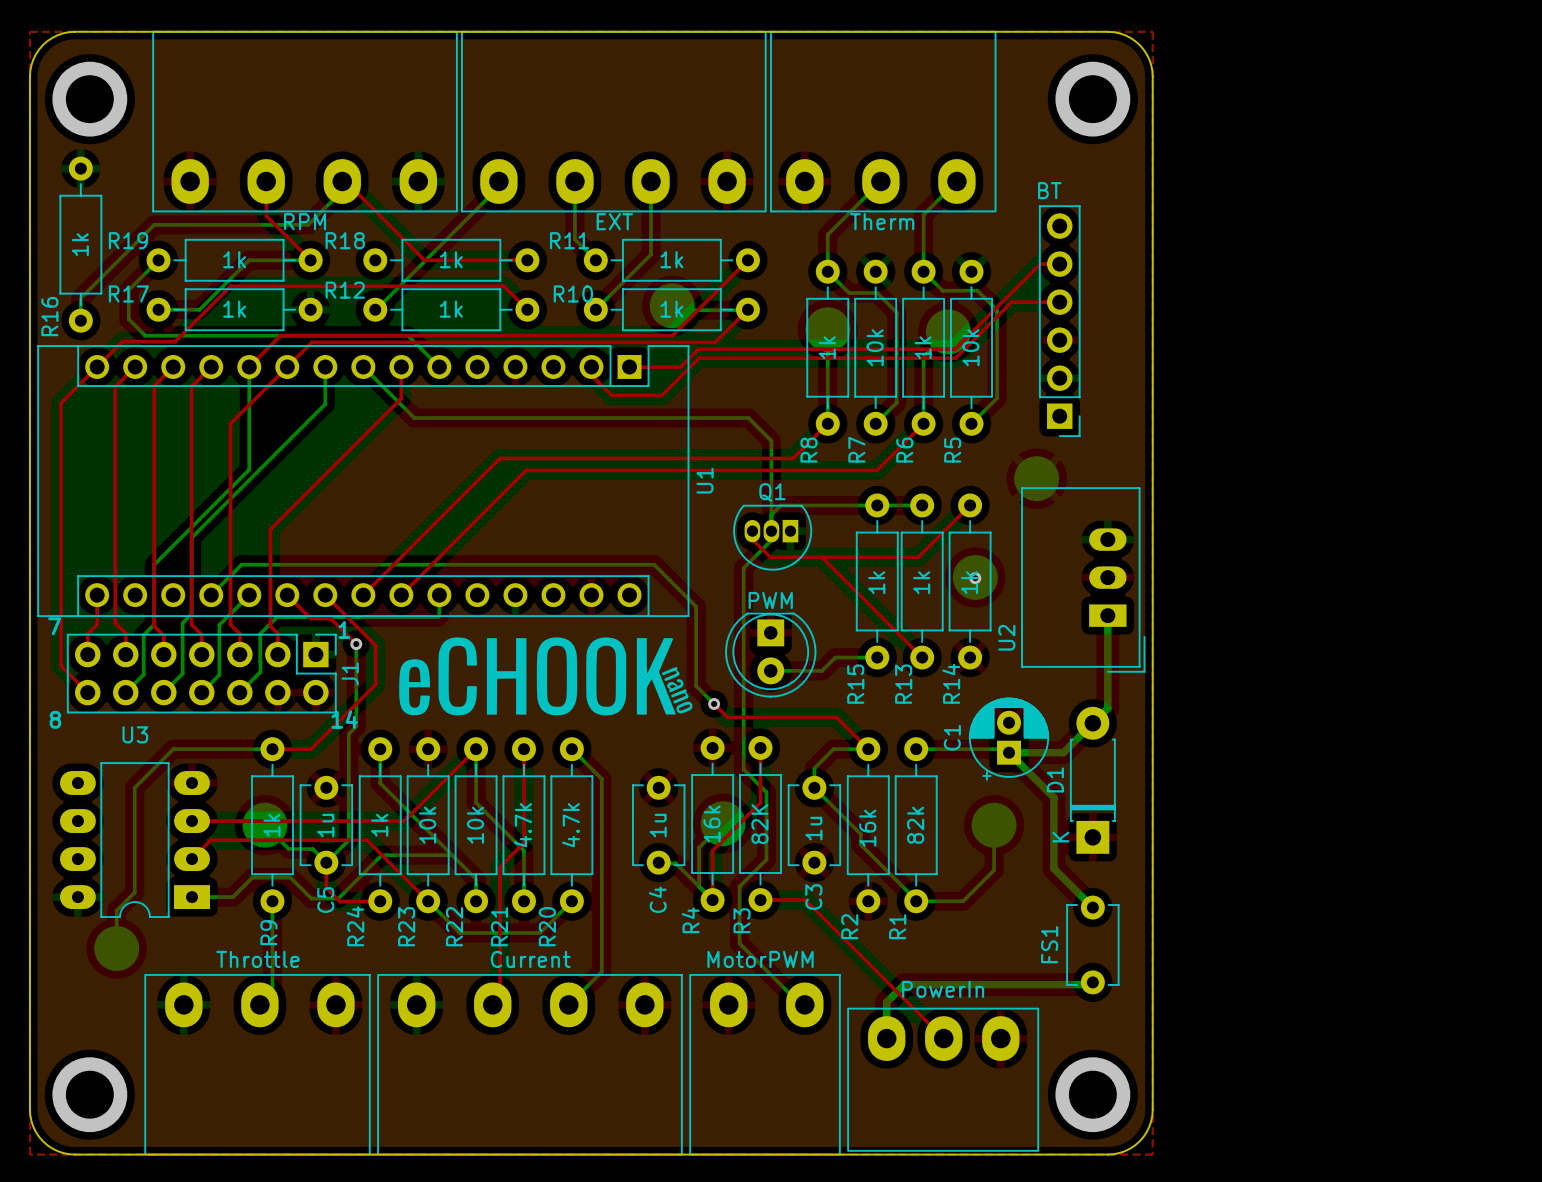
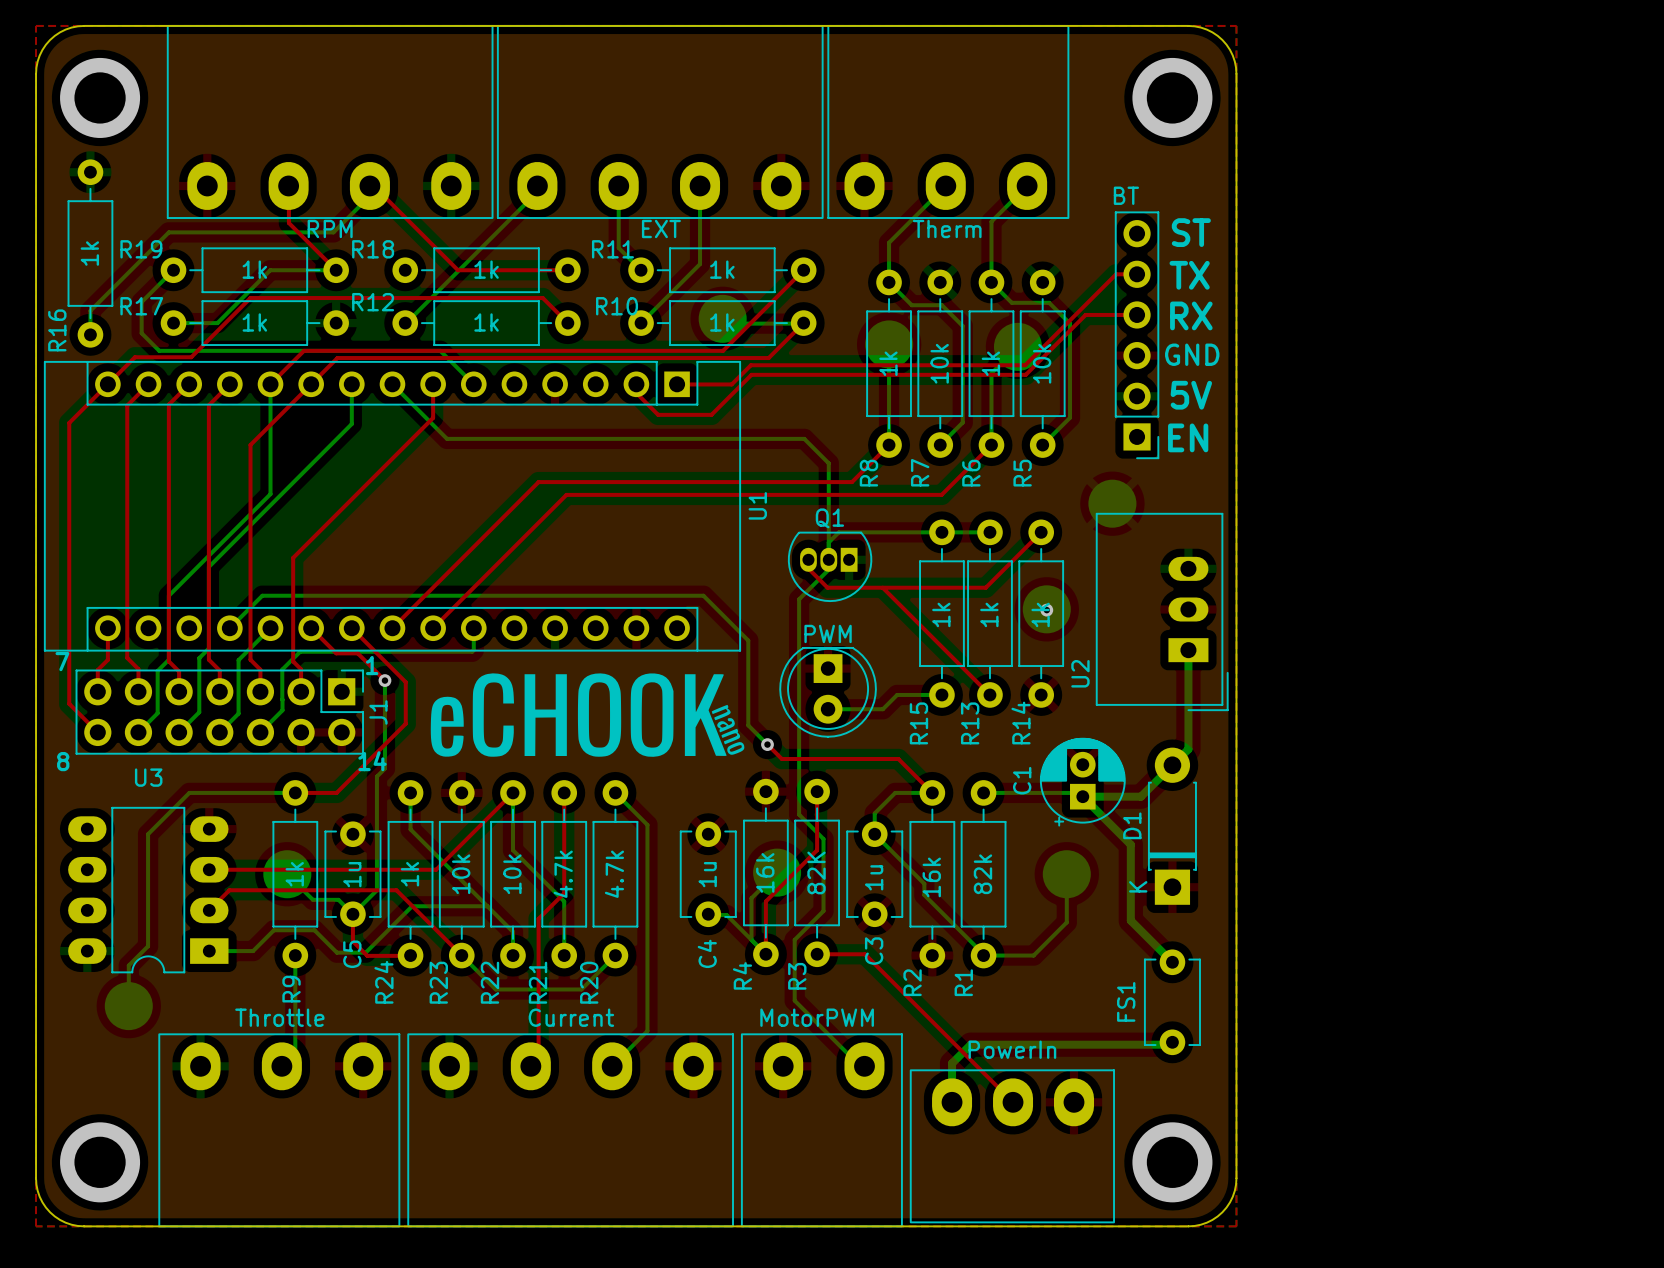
text: none -> ST (1191, 232)
text: none -> TX (1189, 275)
text: none -> RX (1191, 315)
text: none -> GND (1192, 354)
text: none -> 5V (1191, 395)
text: none -> EN (1188, 437)

